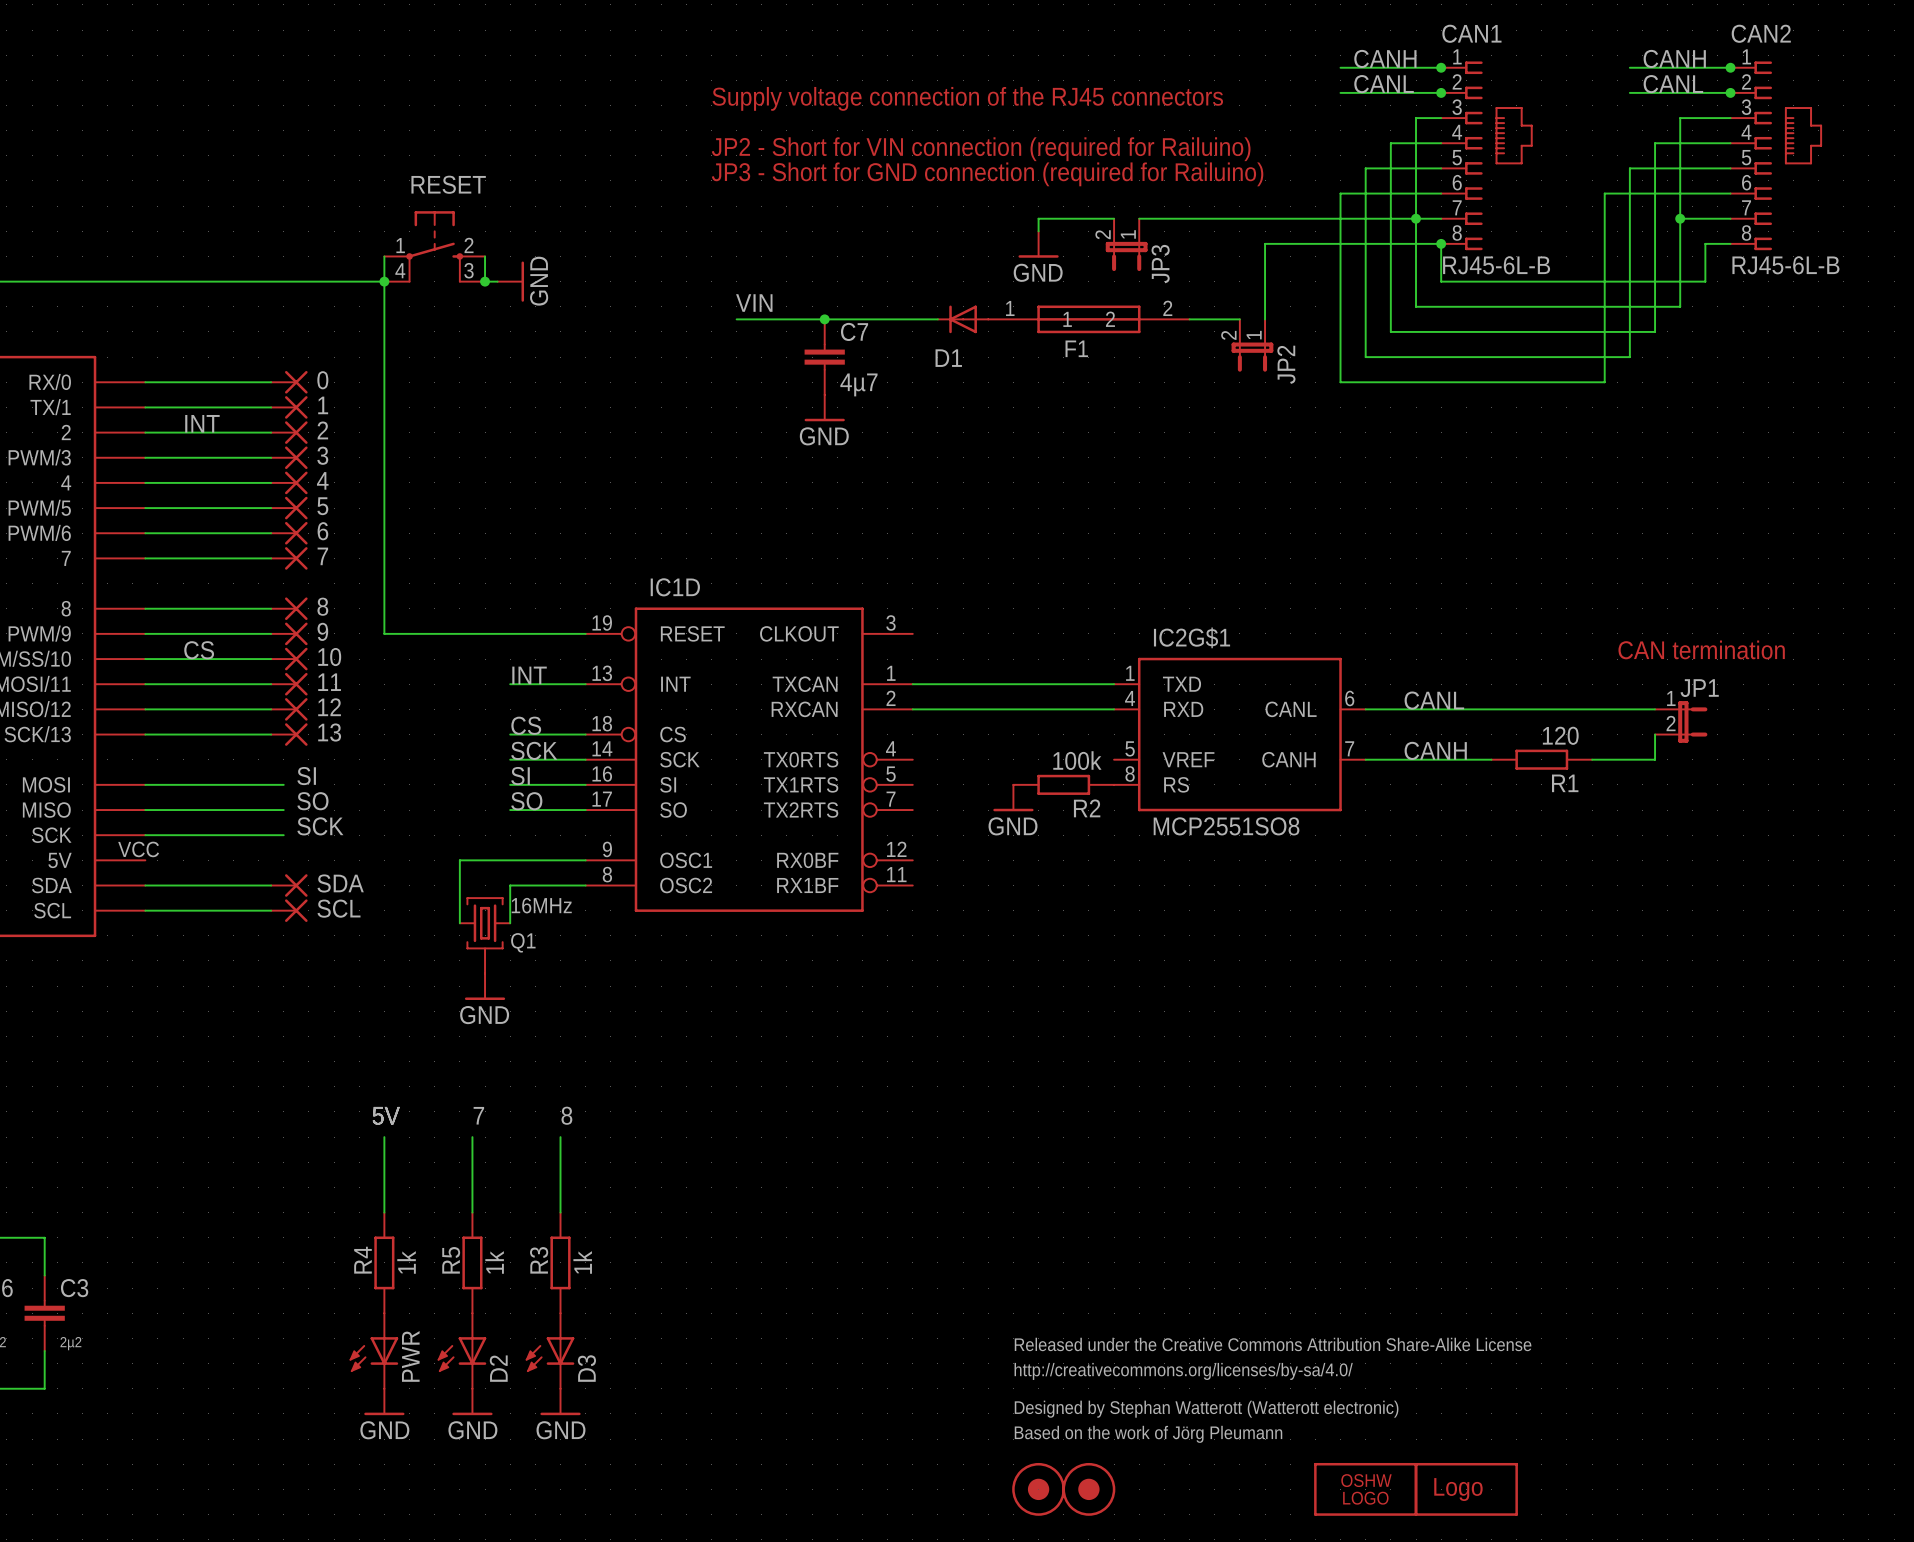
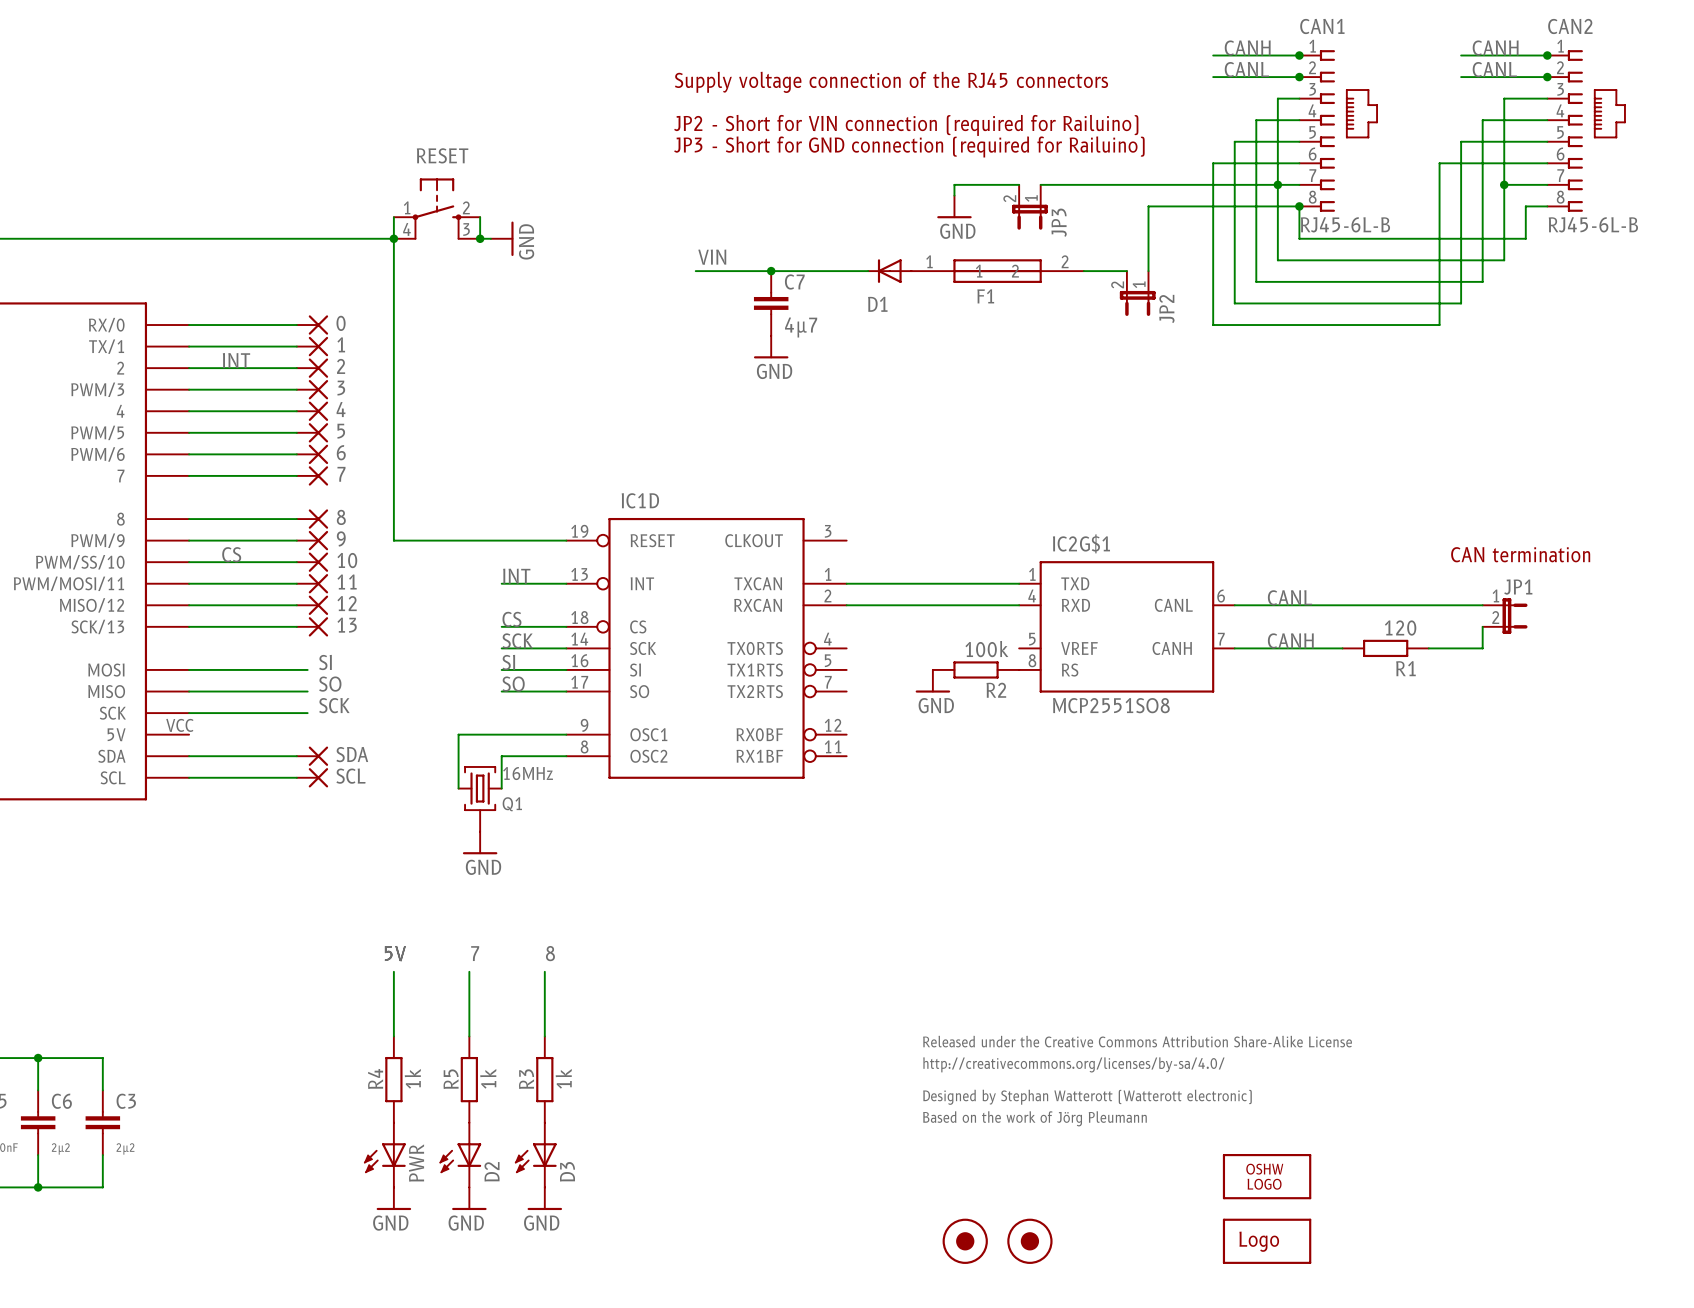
text position: Released under the Creative Commons Attribution Share-Alike License (1273, 1344) -> Released under the Creative Commons Attribution Share-Alike License (1137, 1041)
text position: http://creativecommons.org/licenses/by-sa/4.0/ (1183, 1371) -> http://creativecommons.org/licenses/by-sa/4.0/ (1073, 1064)
text position: Designed by Stephan Watterott (Watterott electronic) (1206, 1409) -> Designed by Stephan Watterott (Watterott electronic) (1087, 1097)
text position: Based on the work of Jörg Pleumann (1148, 1434) -> Based on the work of Jörg Pleumann (1034, 1118)
part: none -> (965, 1241)
part: none -> (1029, 1241)
part: (1038, 1489) -> none
part: (1088, 1489) -> none
part position: (1365, 1489) -> (1267, 1176)
part position: (1466, 1489) -> (1267, 1241)

